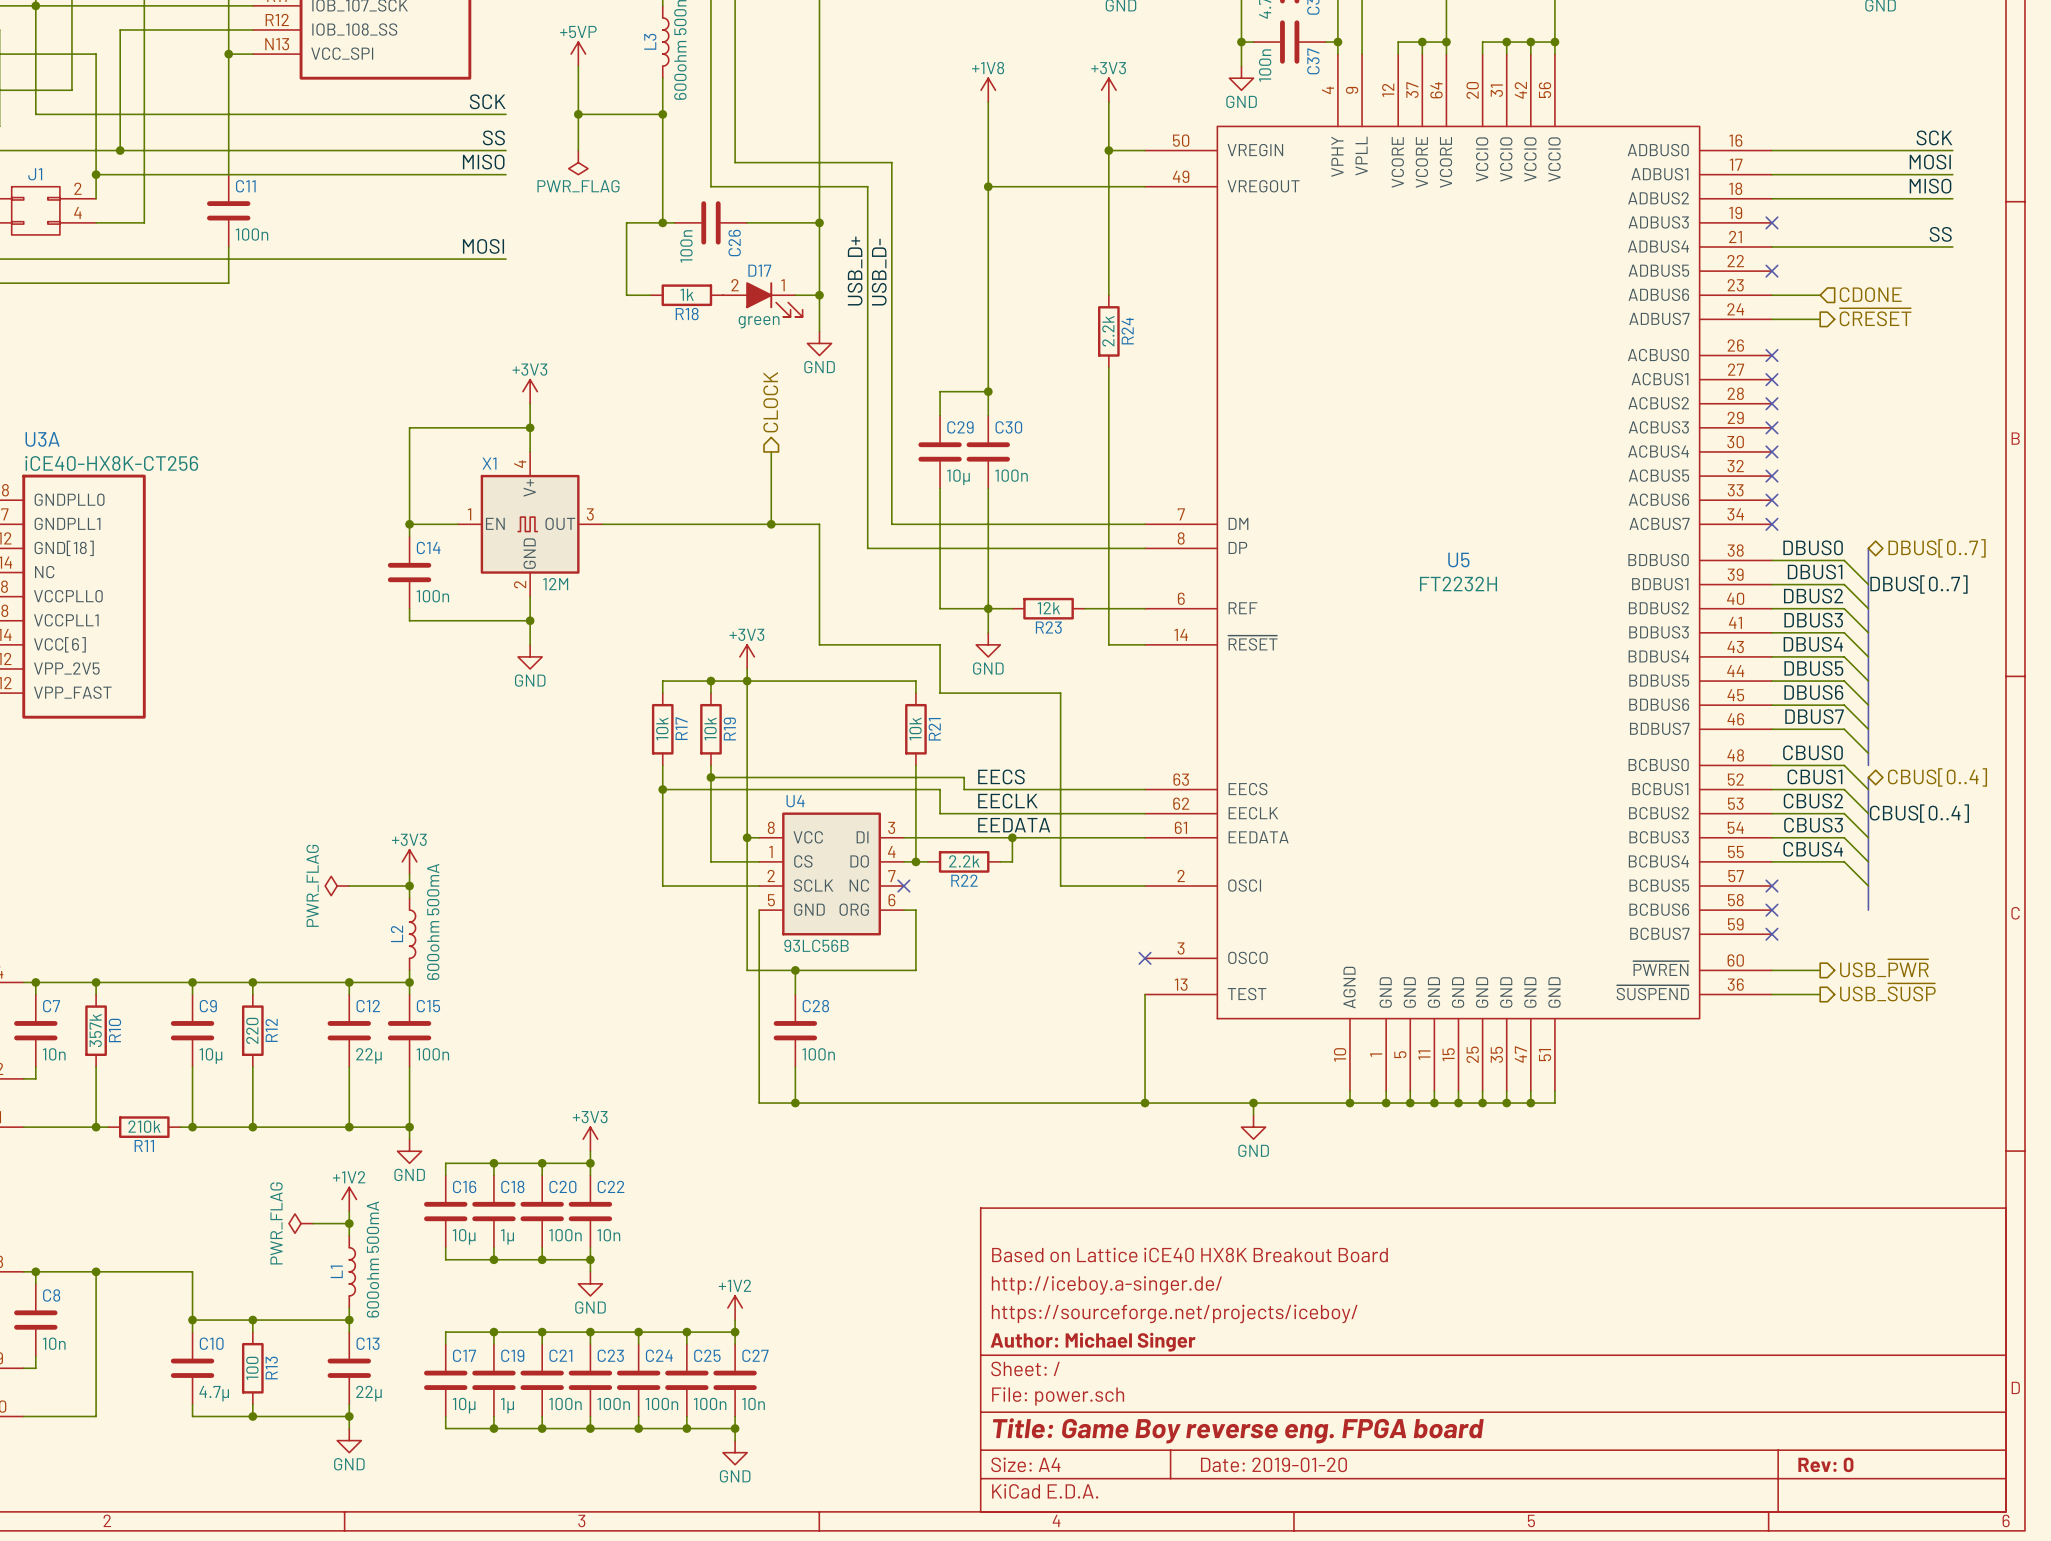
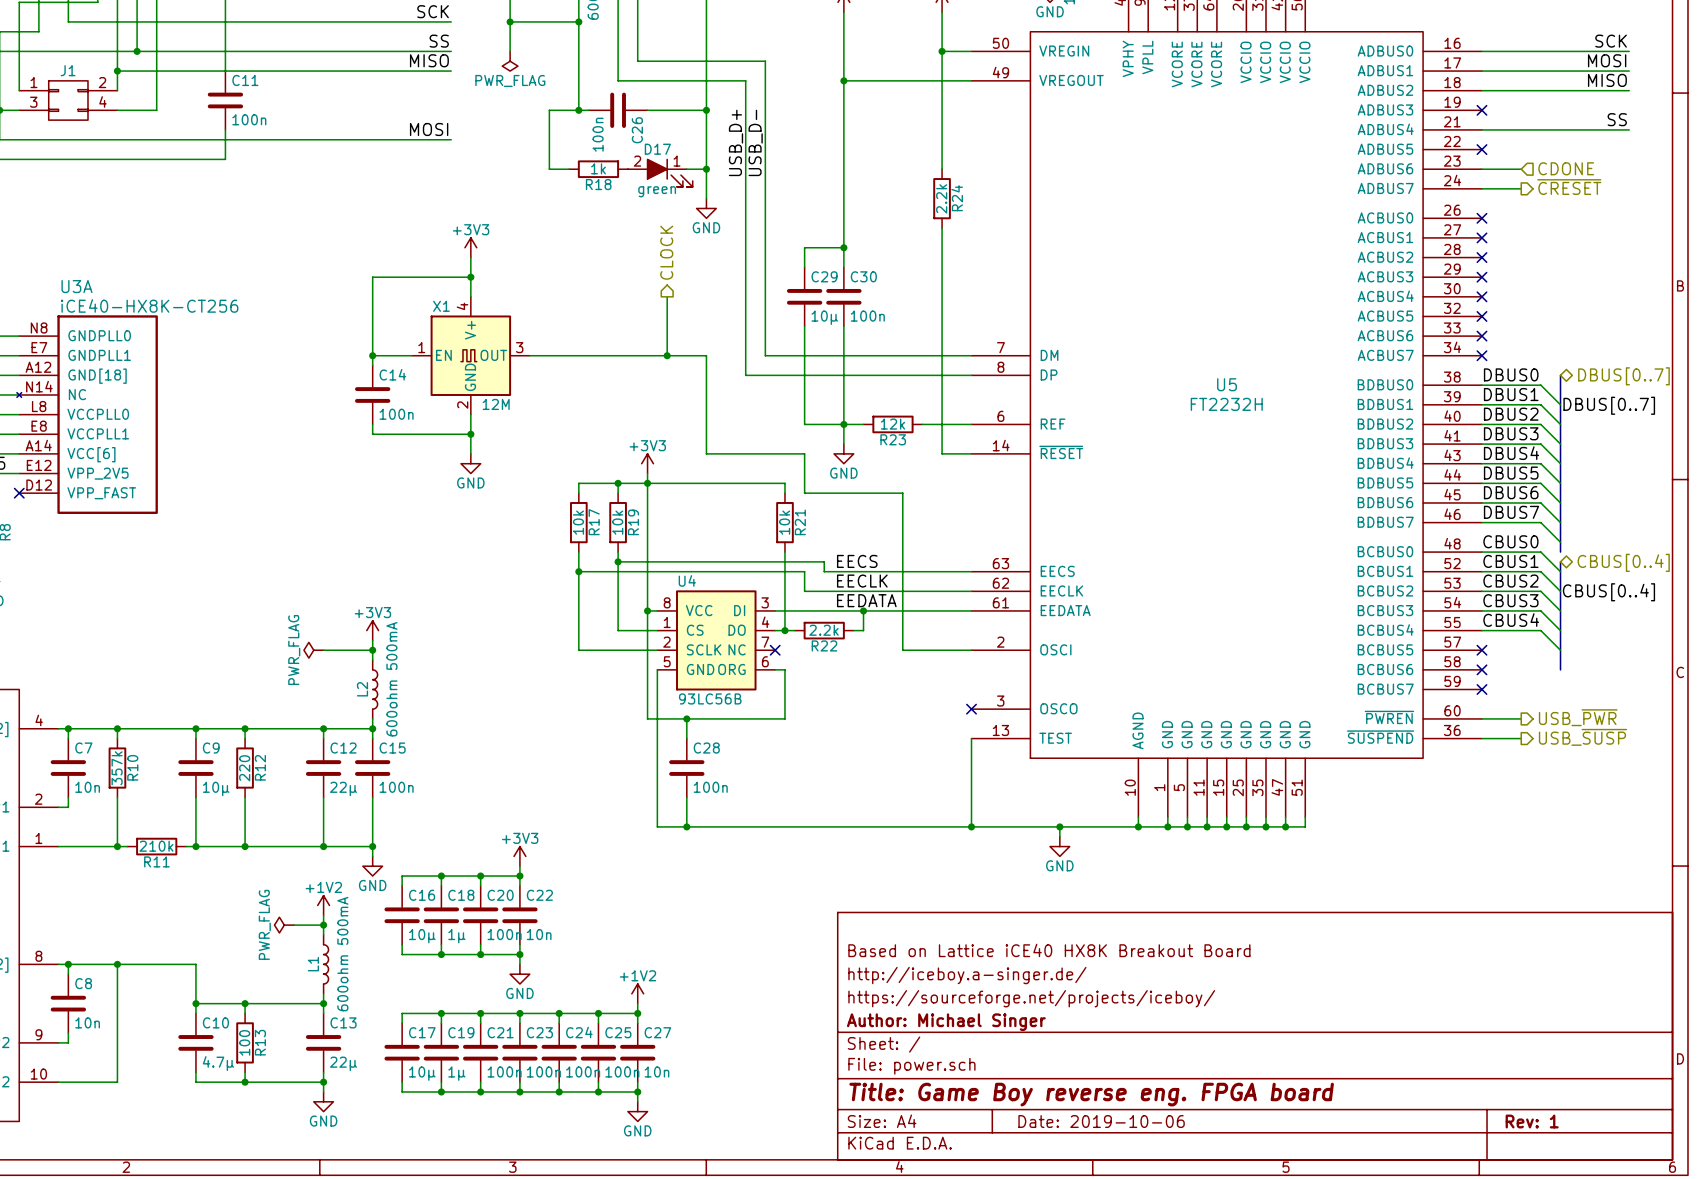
title block: Date: 2019-01-20 (1273, 1464) -> Date: 2019-10-06 (1101, 1121)
title block: Rev: 0 (1825, 1464) -> Rev: 1 (1532, 1121)

